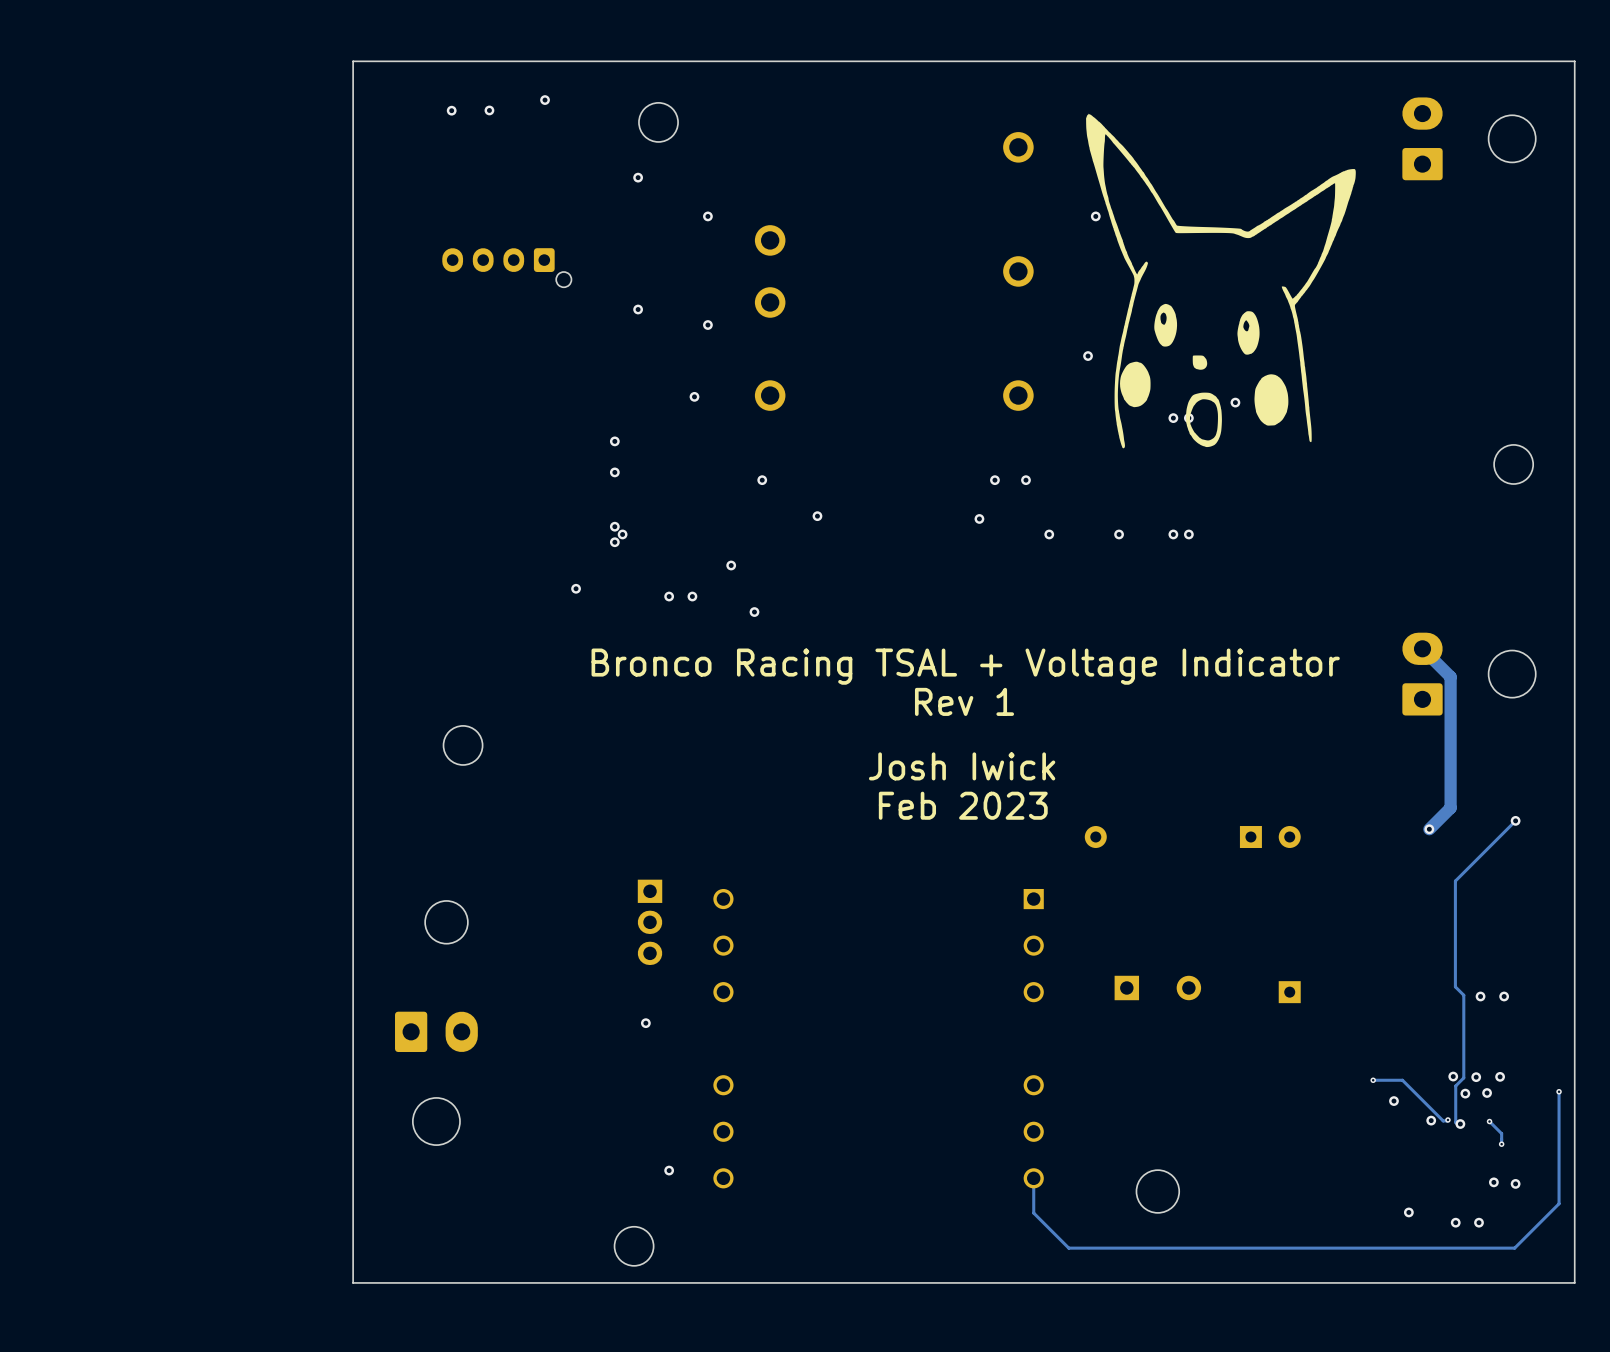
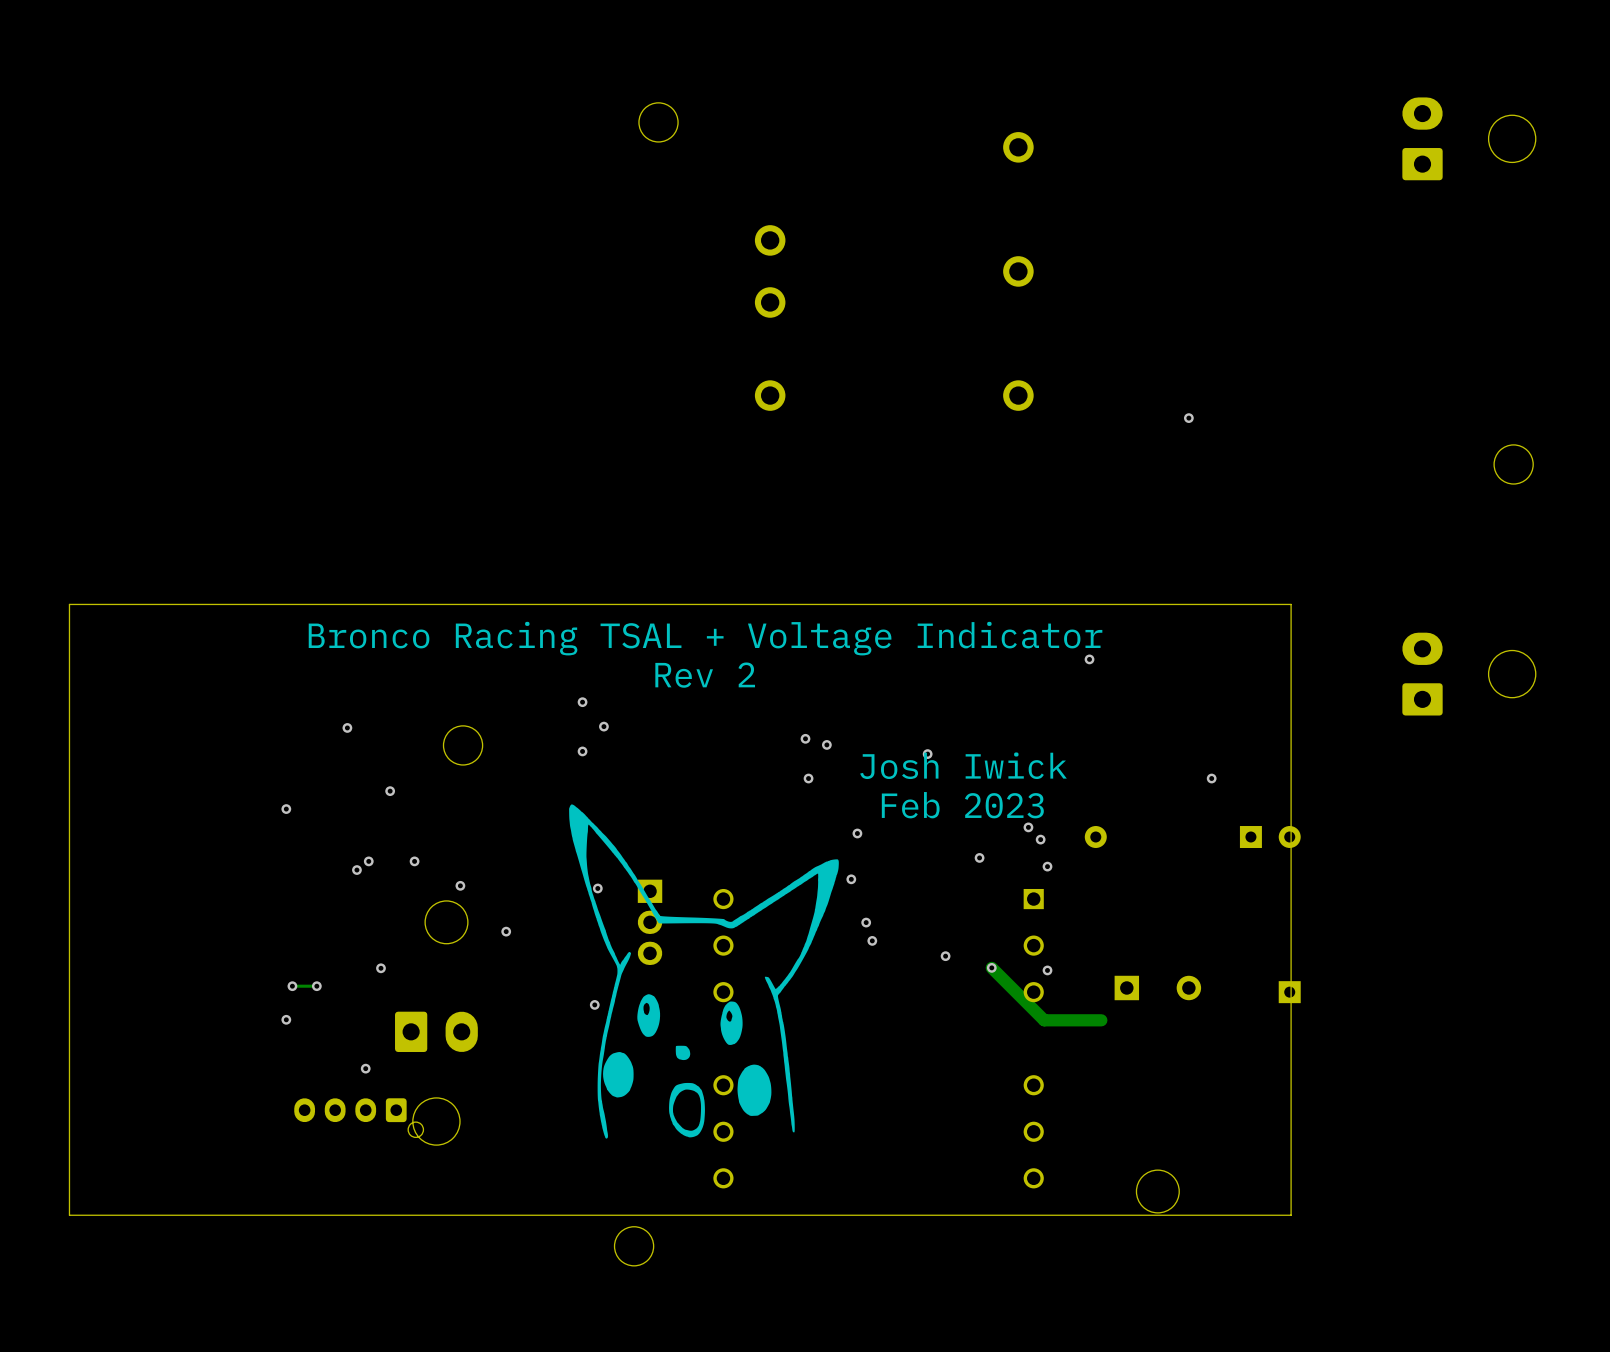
board edge: (1574, 61) (353, 61) (353, 1282) (1574, 1282) (1574, 61) -> none
via: (545, 100) -> none
via: (451, 110) -> none
via: (489, 110) -> none
drawing: [1086, 113, 1356, 449] -> none
via: (638, 177) -> none
via: (707, 216) -> none
via: (1095, 216) -> none
part: (506, 267) -> none
via: (638, 309) -> none
via: (707, 325) -> none
via: (1088, 356) -> none
via: (694, 396) -> none
via: (1235, 402) -> none
via: (1173, 418) -> none
via: (614, 441) -> none
via: (614, 472) -> none
via: (762, 480) -> none
via: (994, 480) -> none
via: (1025, 480) -> none
via: (817, 516) -> none
via: (979, 518) -> none
via: (614, 526) -> none
via: (622, 534) -> none
via: (1049, 534) -> none
via: (1119, 534) -> none
via: (1173, 534) -> none
via: (1188, 534) -> none
via: (614, 542) -> none
via: (731, 565) -> none
via: (576, 588) -> none
via: (669, 596) -> none
via: (692, 596) -> none
board edge: none -> (1291, 604) (1291, 1215) (69, 1215) (69, 604) (1291, 604)
via: (754, 612) -> none
track: (1422, 648) (1450, 676) (1450, 807) (1429, 829) -> none
via: none -> (1089, 659)
text position: Bronco Racing TSAL + Voltage Indicator (965, 666) -> Bronco Racing TSAL + Voltage Indicator (705, 638)
text: none -> Rev 2 (705, 675)
text: Rev 1 (964, 701) -> none
via: none -> (582, 702)
via: none -> (603, 726)
via: none -> (347, 727)
via: none -> (805, 738)
via: none -> (826, 744)
via: none -> (582, 751)
via: none -> (927, 754)
via: none -> (808, 778)
via: none -> (1211, 778)
via: none -> (390, 791)
drawing: none -> [569, 803, 839, 1139]
via: none -> (286, 809)
track: (1515, 820) (1455, 881) (1455, 986) (1463, 995) (1463, 1077) (1455, 1085) (1455, 1122) (1460, 1124) -> none
via: (1515, 820) -> none
via: none -> (1028, 827)
via: (1429, 829) -> none
via: none -> (857, 833)
via: none -> (1040, 839)
via: none -> (979, 857)
via: none -> (368, 861)
via: none -> (414, 861)
via: none -> (1047, 866)
via: none -> (356, 870)
via: none -> (851, 879)
via: none -> (460, 885)
via: none -> (597, 888)
via: none -> (866, 922)
via: none -> (506, 931)
via: none -> (872, 940)
via: none -> (945, 956)
track: none -> (991, 967) (1044, 1020) (1101, 1020)
via: none -> (991, 967)
via: none -> (380, 968)
via: none -> (1047, 970)
via: none -> (292, 986)
track: none -> (316, 986) (292, 986)
via: none -> (316, 986)
via: (1480, 996) -> none
via: (1504, 996) -> none
via: none -> (286, 1019)
via position: (645, 1023) -> (594, 1004)
via: none -> (365, 1068)
via: (1453, 1076) -> none
via: (1500, 1076) -> none
via: (1476, 1077) -> none
track: (1373, 1080) (1402, 1080) (1443, 1120) (1447, 1119) -> none
via: (1373, 1080) -> none
track: (1559, 1091) (1559, 1203) (1514, 1248) (1068, 1248) (1033, 1213) (1033, 1178) -> none
via: (1559, 1091) -> none
via: (1487, 1092) -> none
via: (1465, 1093) -> none
via: (1393, 1101) -> none
part: none -> (358, 1117)
via: (1447, 1119) -> none
via: (1431, 1120) -> none
track: (1489, 1121) (1501, 1133) (1501, 1144) -> none
via: (1489, 1121) -> none
via: (1460, 1124) -> none
via: (1501, 1144) -> none
via: (669, 1170) -> none
via: (1493, 1182) -> none
via: (1515, 1183) -> none
via: (1408, 1212) -> none
via: (1455, 1222) -> none
via: (1479, 1222) -> none

